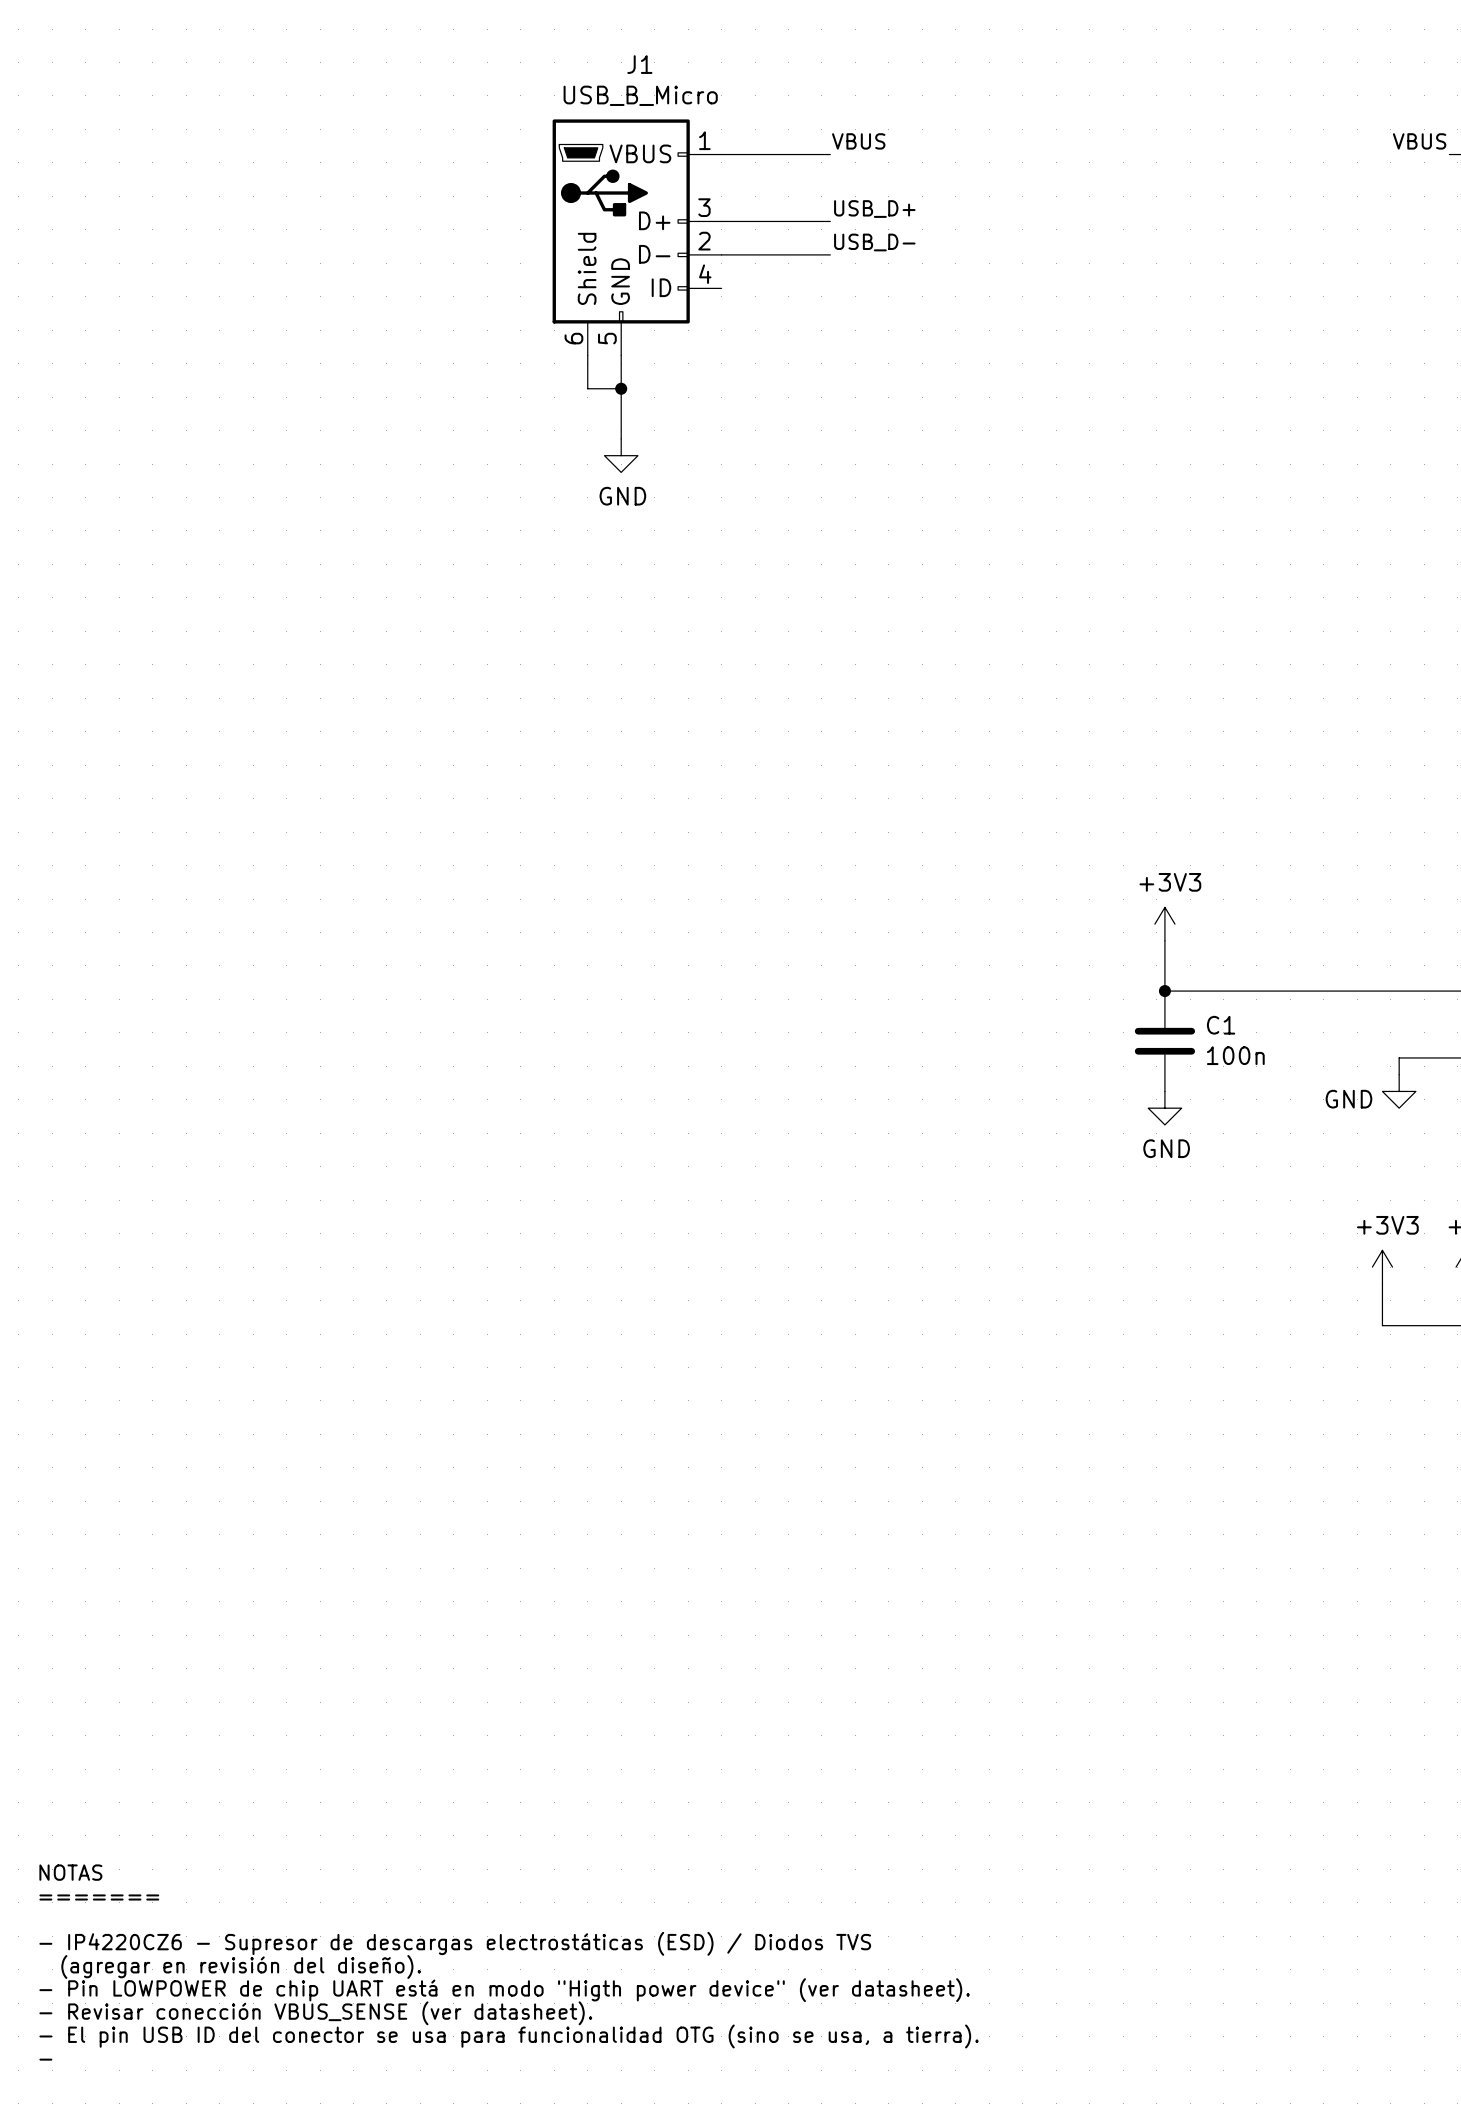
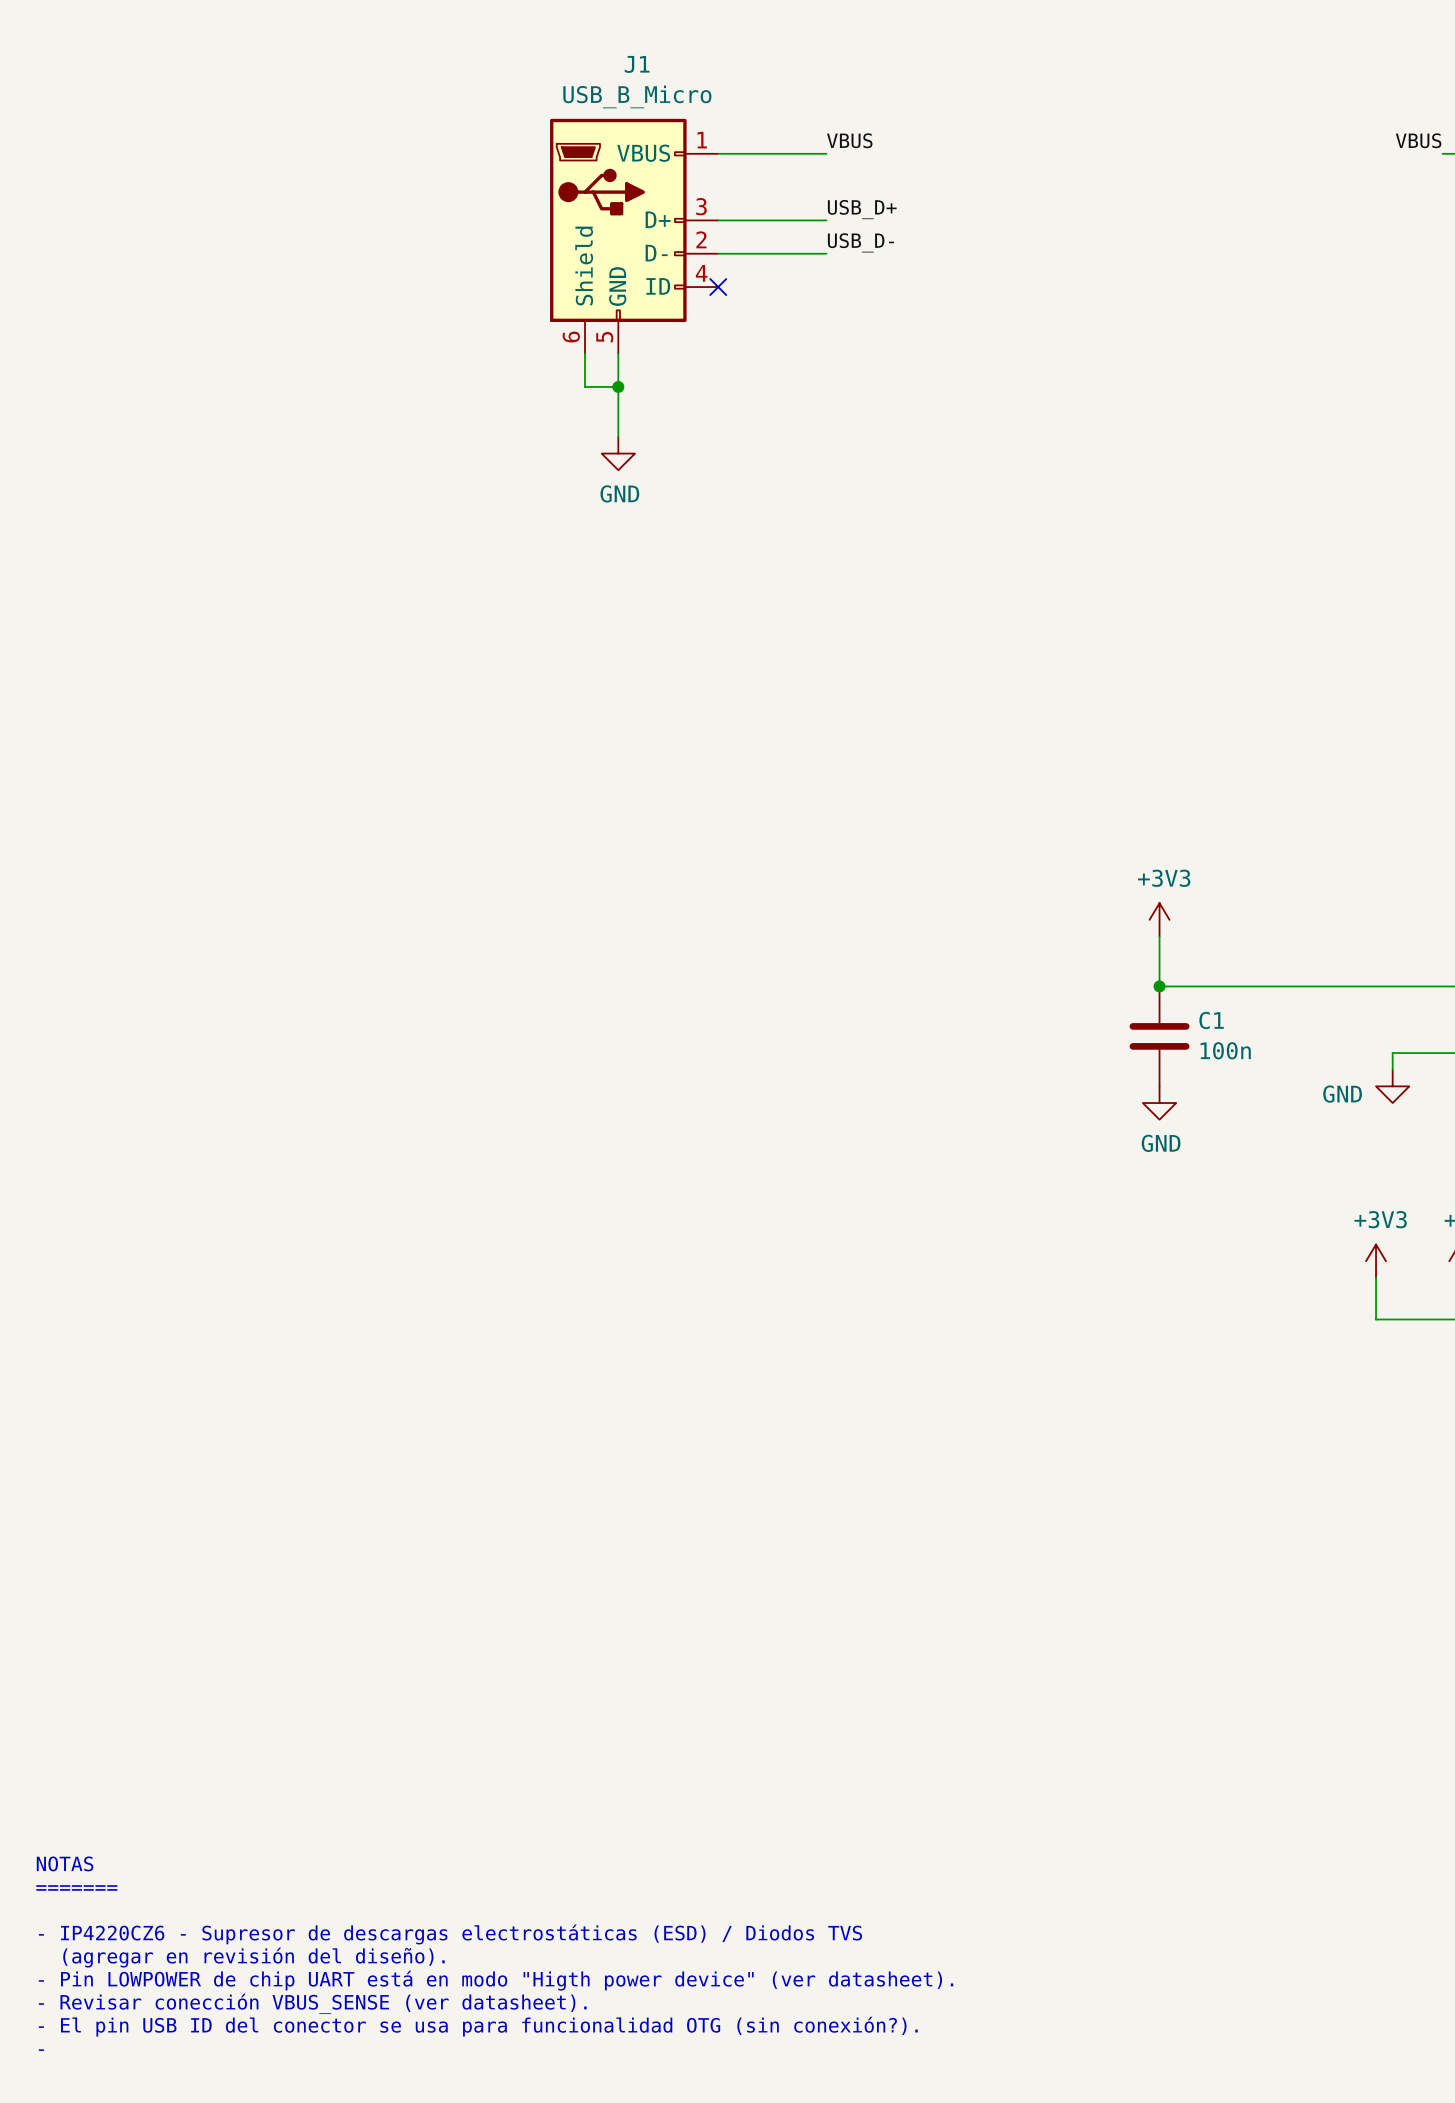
no-connect mark: none -> (718, 287)
text: - El pin USB ID del conector se usa para funcionalidad OTG (sino se usa, a tierra). (509, 2036) -> - El pin USB ID del conector se usa para funcionalidad OTG (sin conexión?). (478, 2026)

